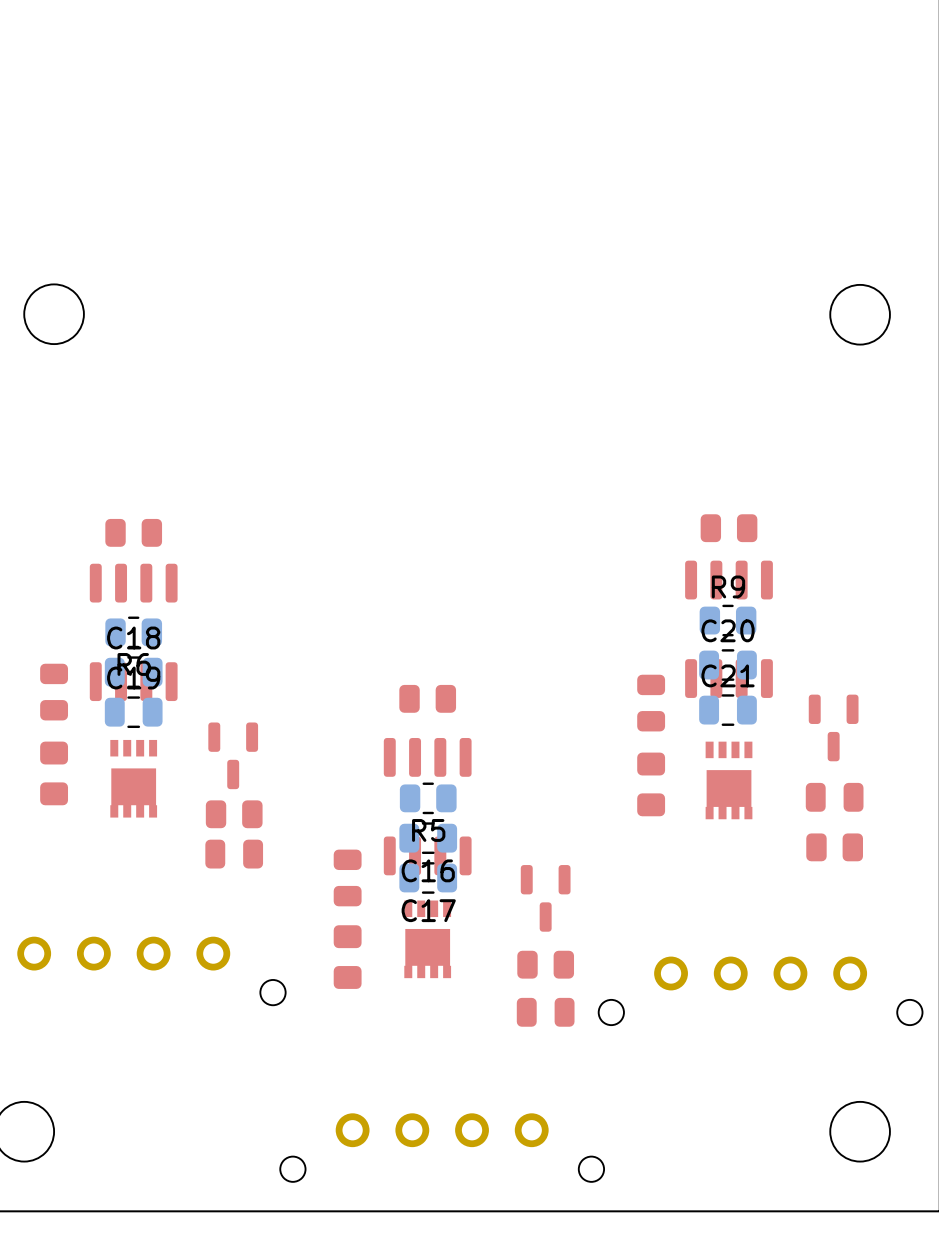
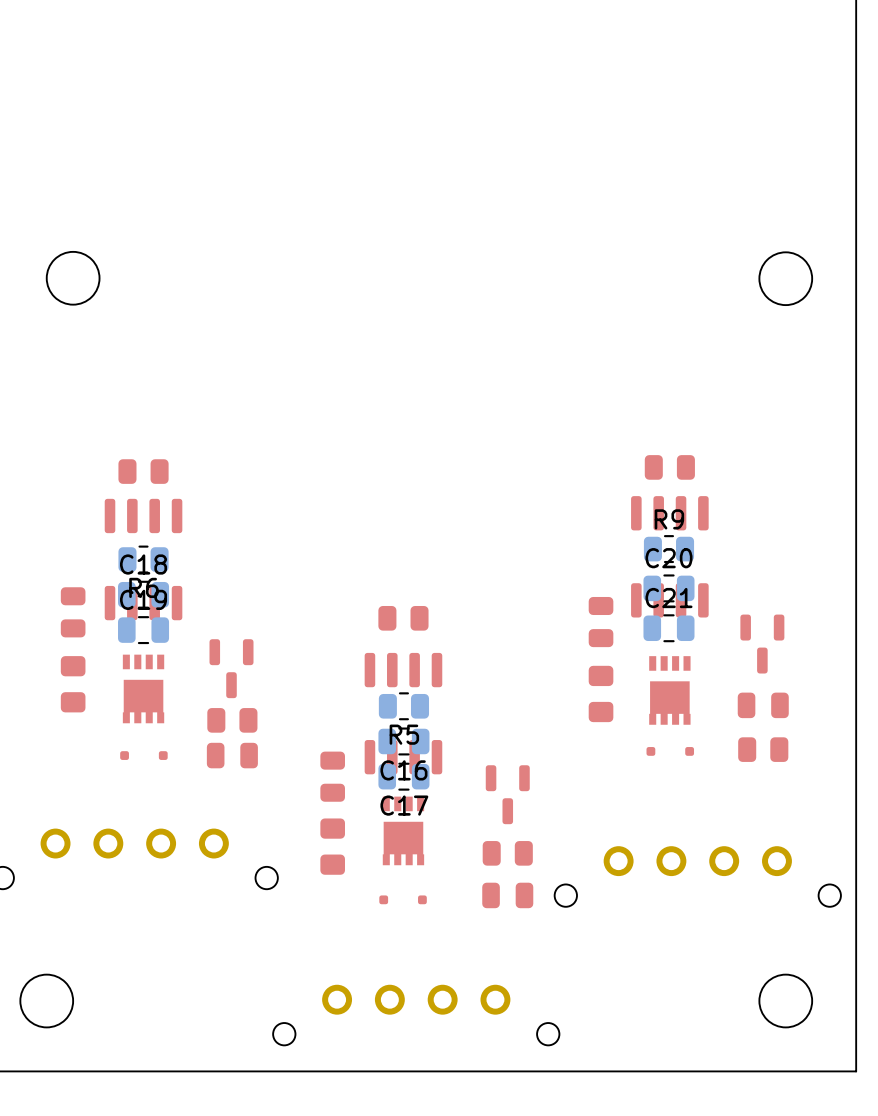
part: none -> (670, 751)
part: none -> (143, 755)
part: none -> (403, 899)

